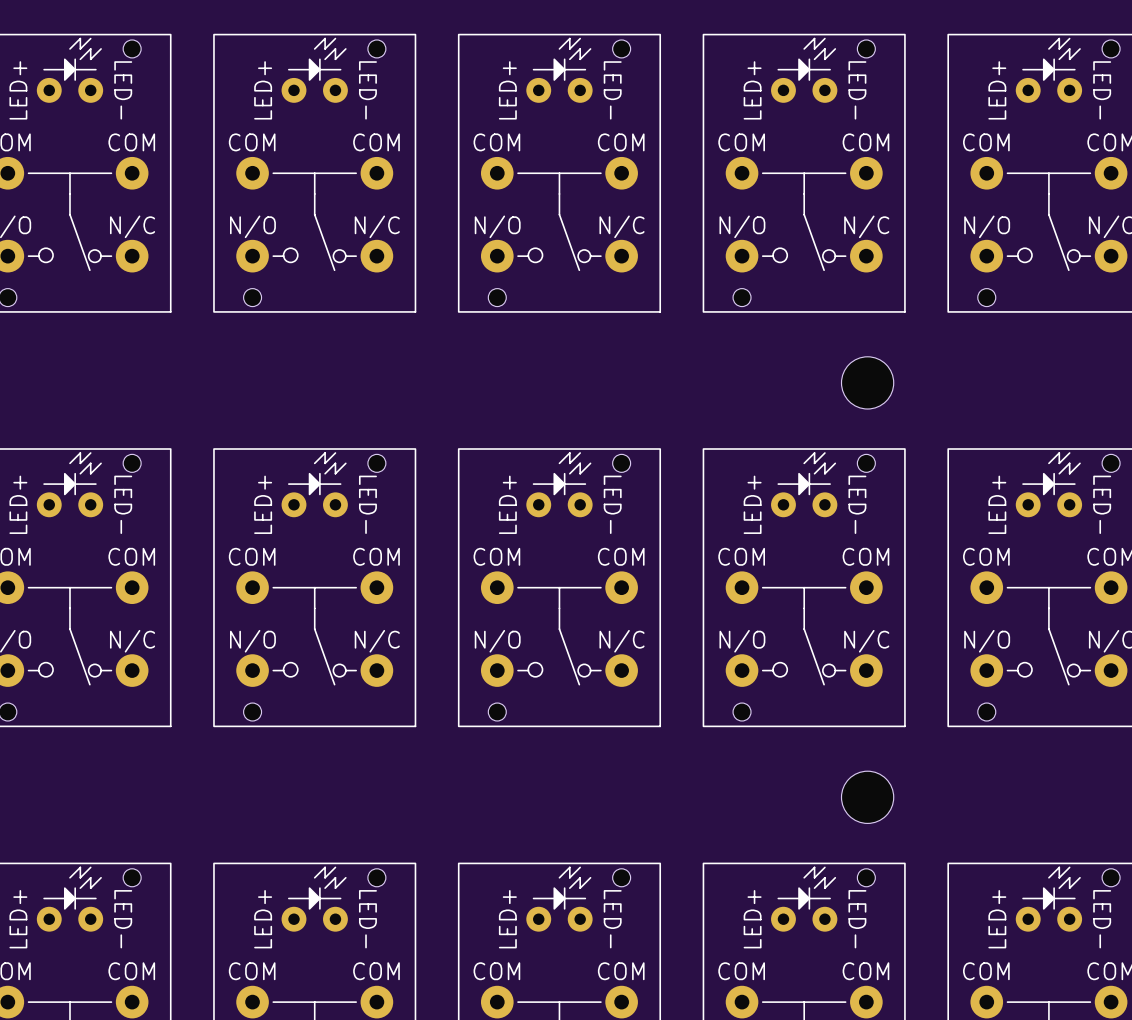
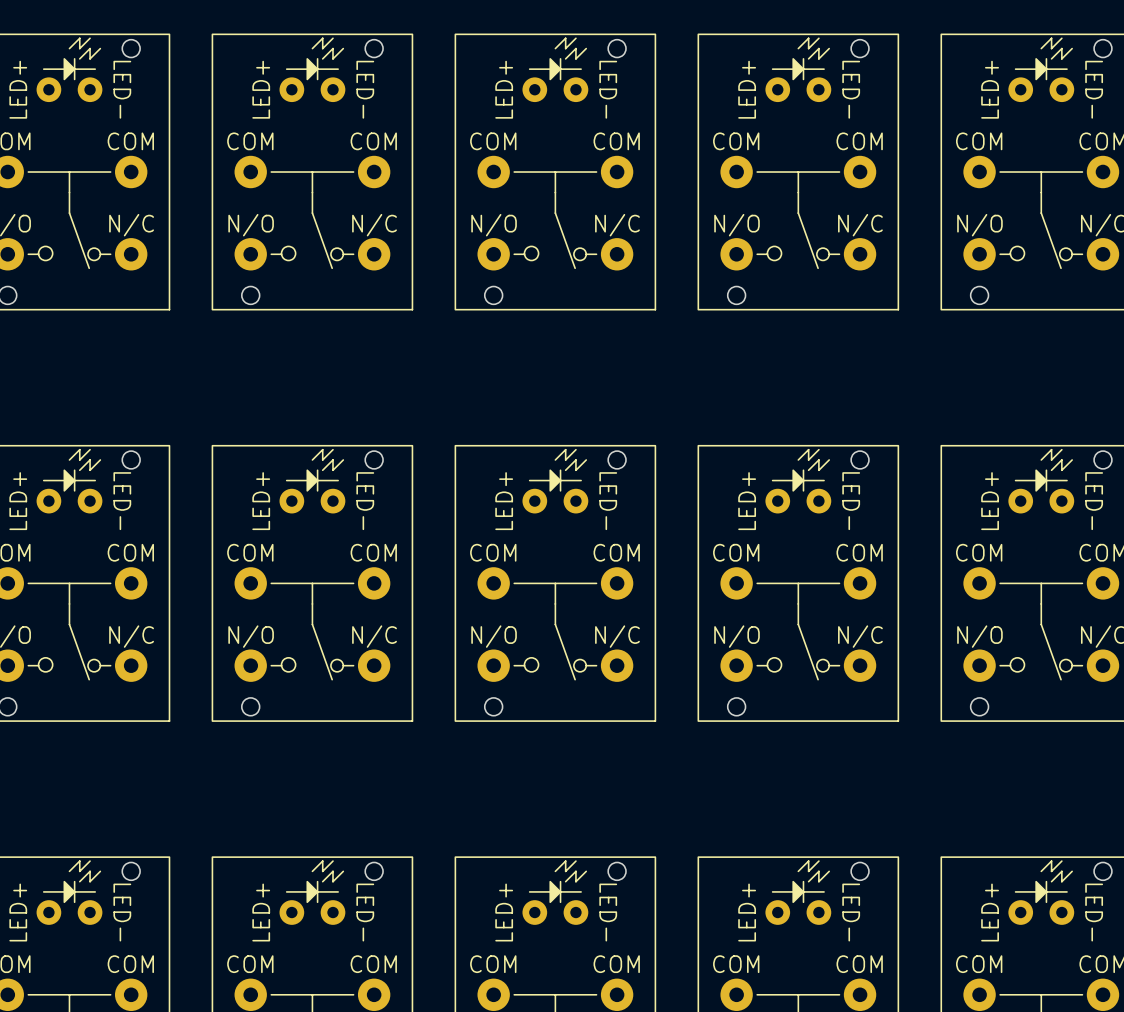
part: (867, 382) -> none
part: (867, 797) -> none

